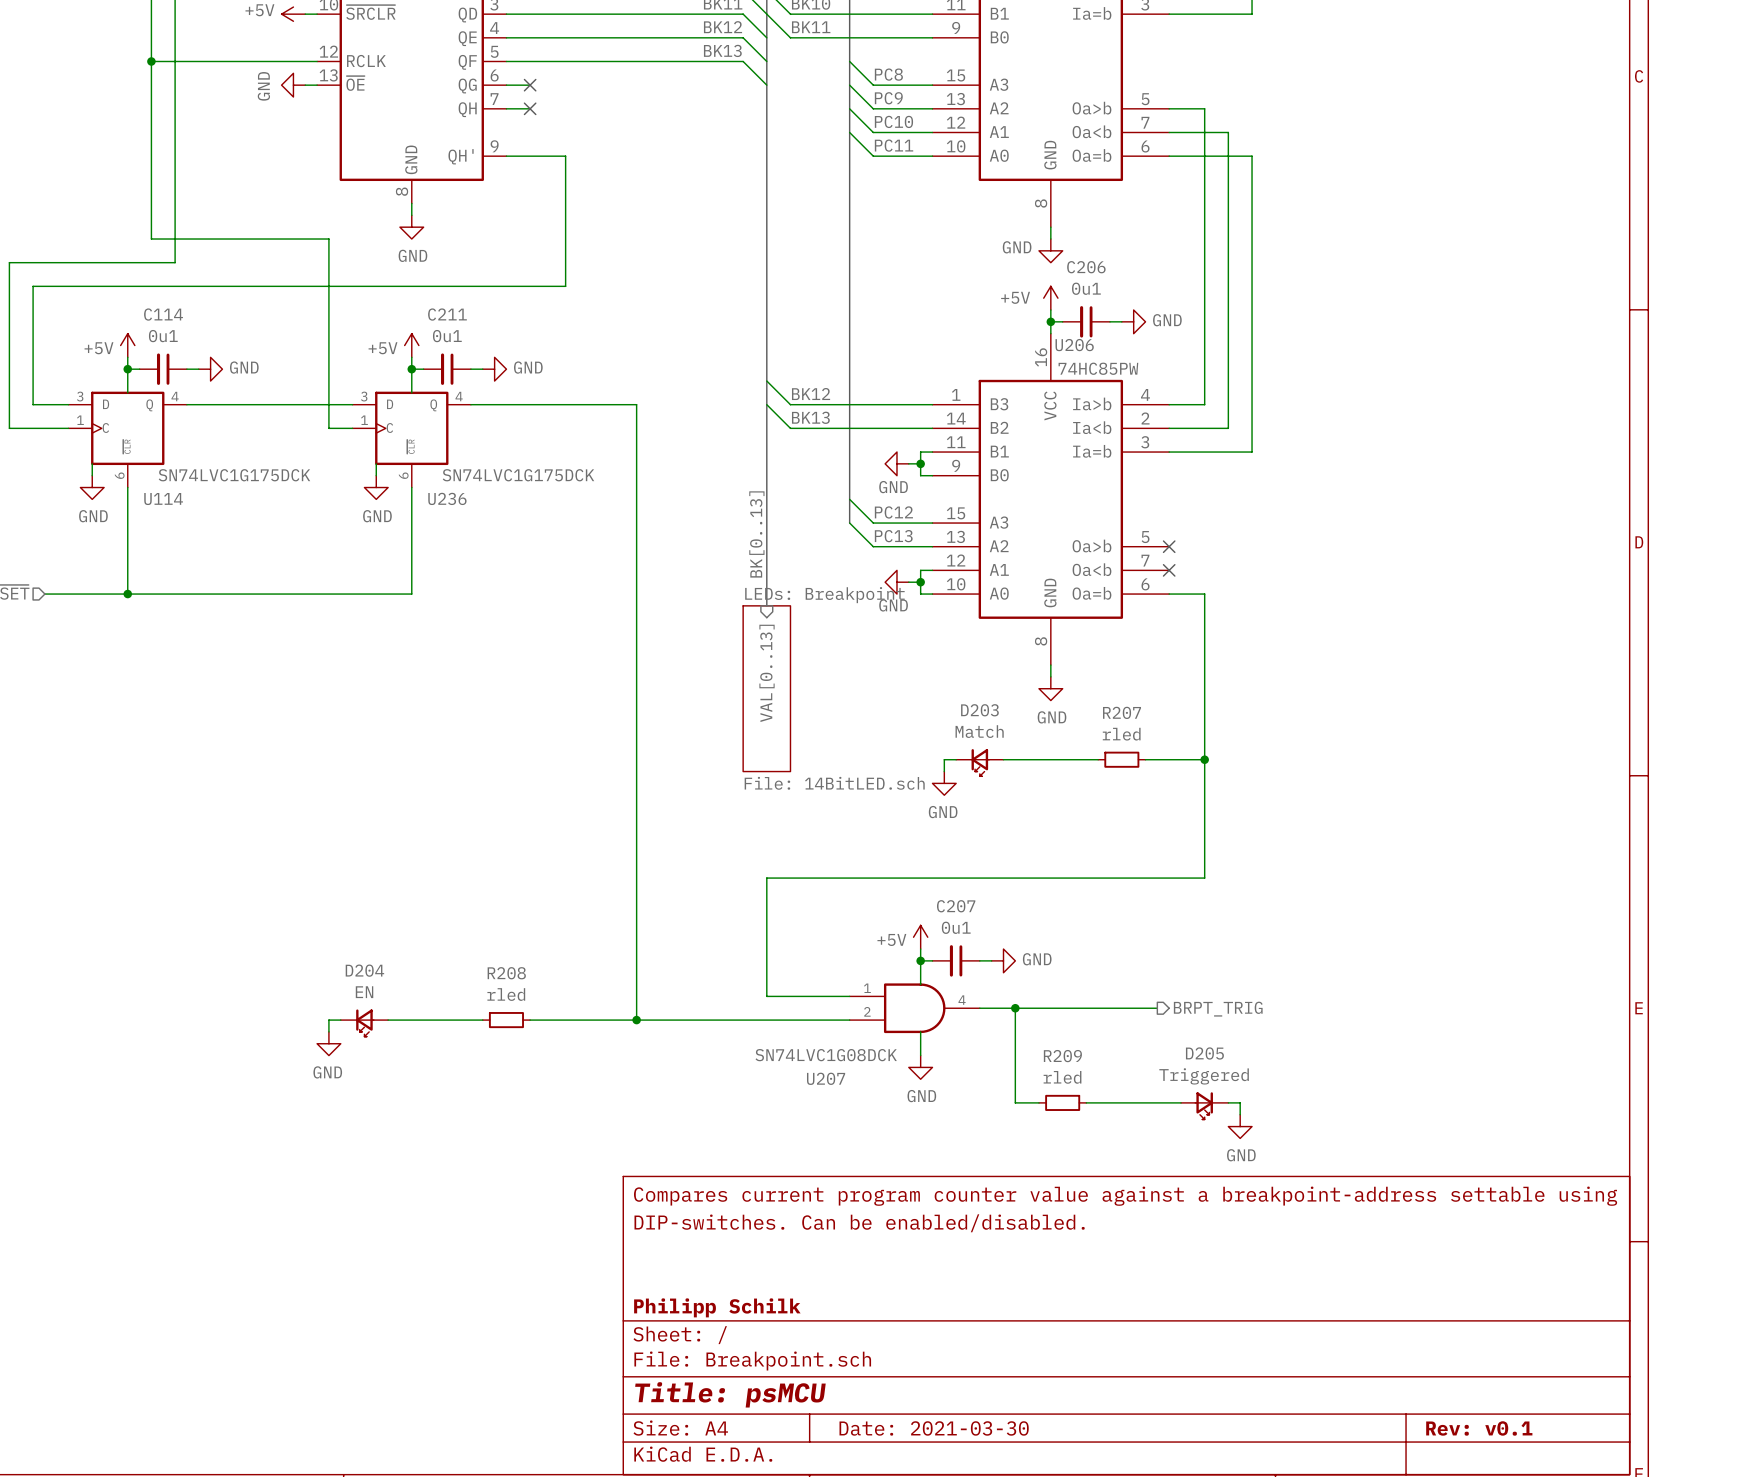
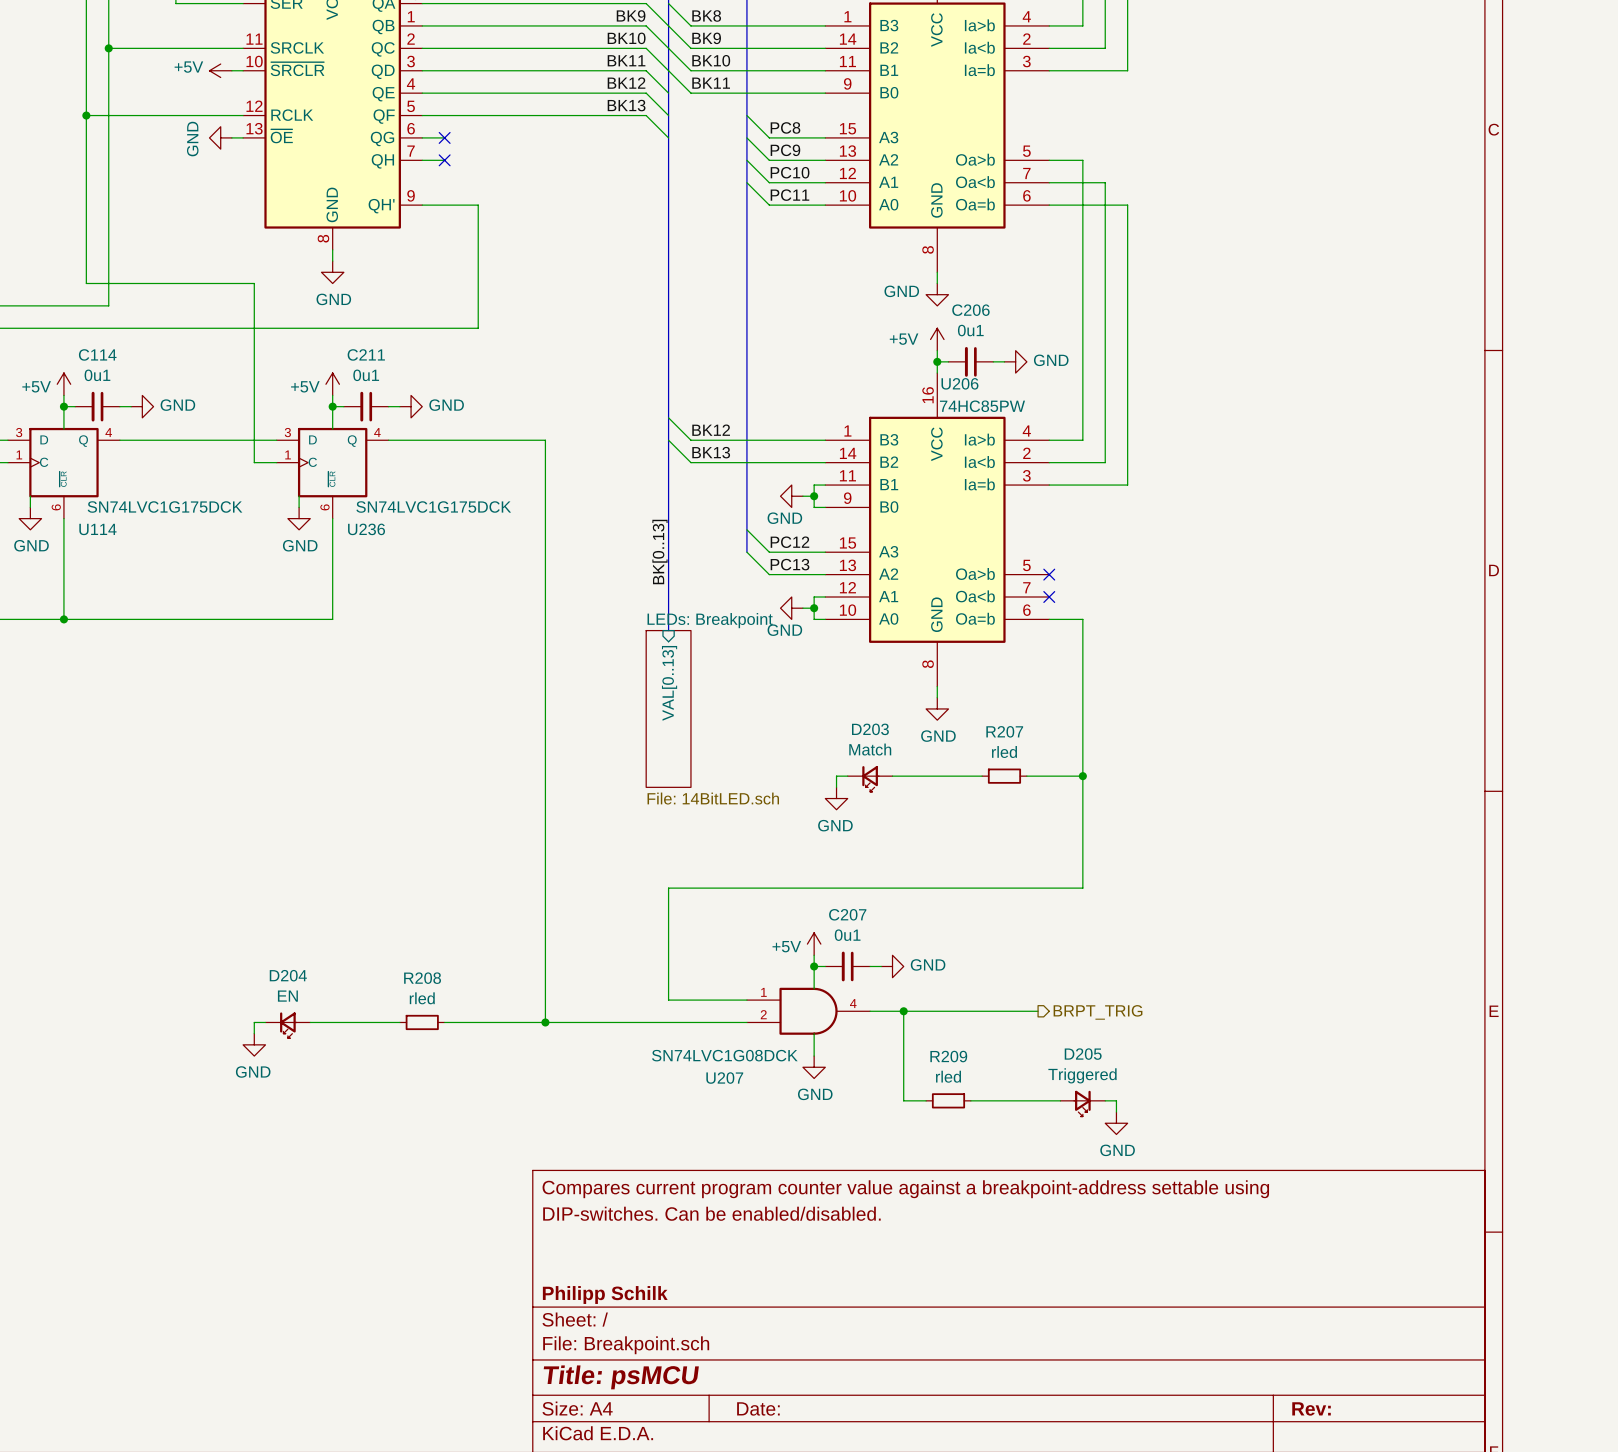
title block: Date: 2021-03-30 (934, 1428) -> Date: (758, 1408)
title block: Rev: v0.1 (1479, 1428) -> Rev: (1311, 1408)

